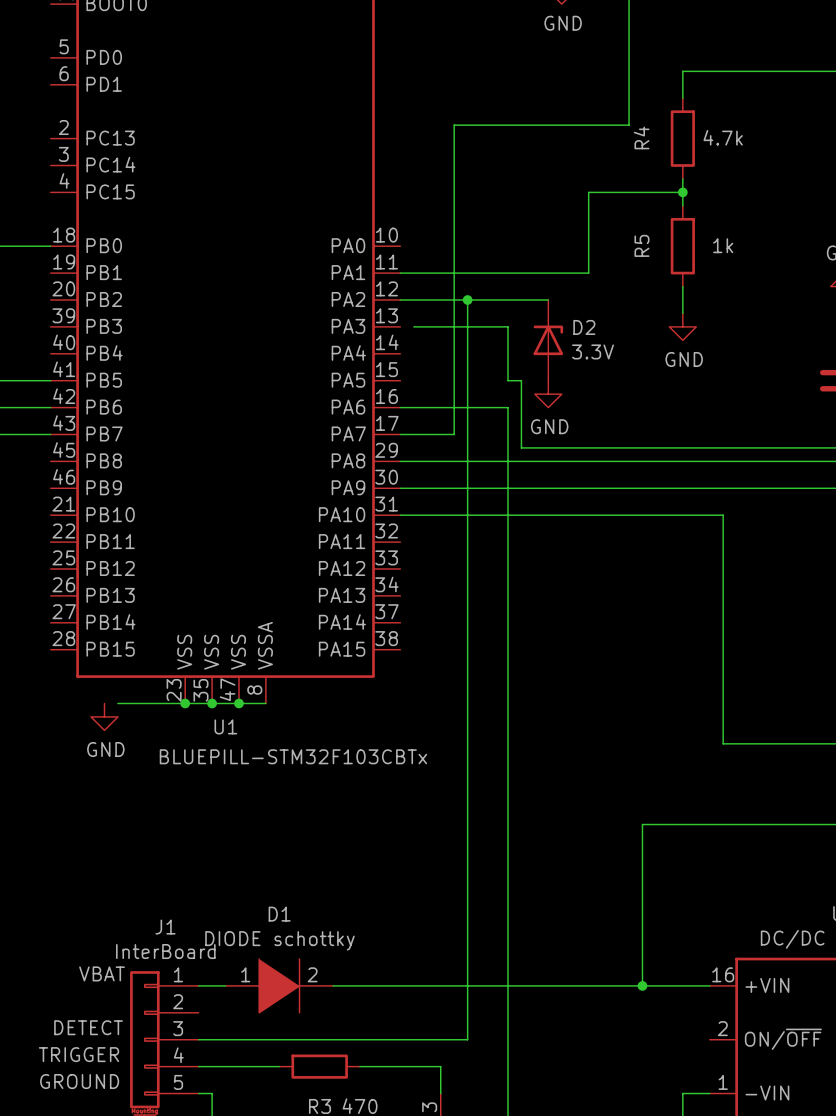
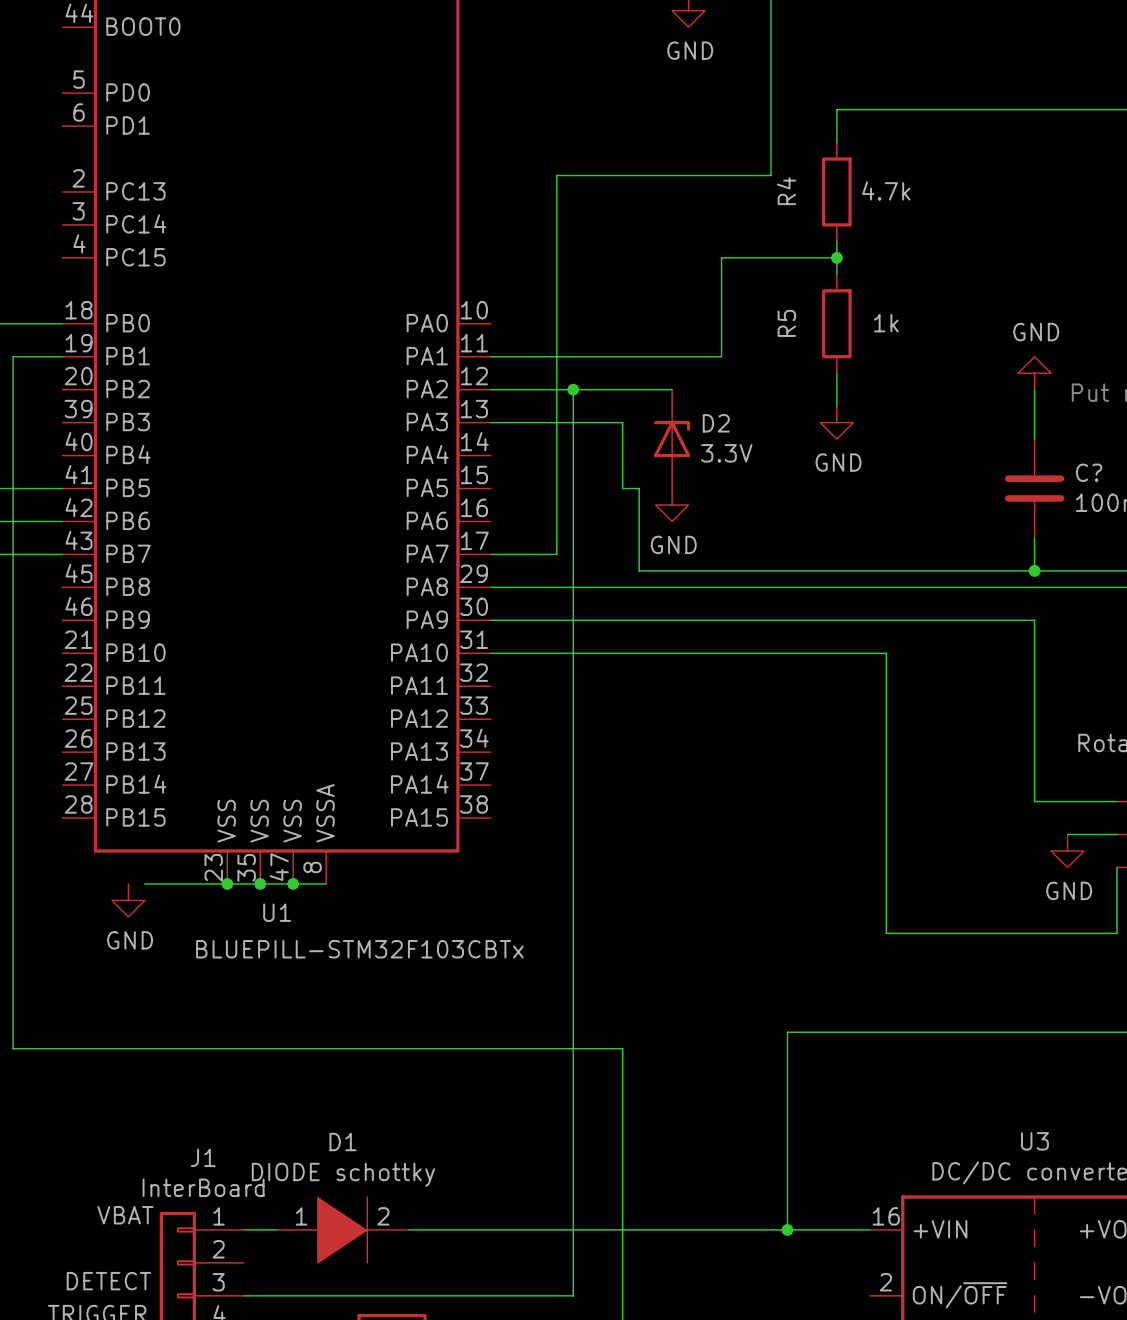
wire: none -> (490, 422) (507, 422)
wire: (400, 407) (507, 407) (507, 837) -> (62, 356) (13, 356) (13, 1048) (622, 1048)

